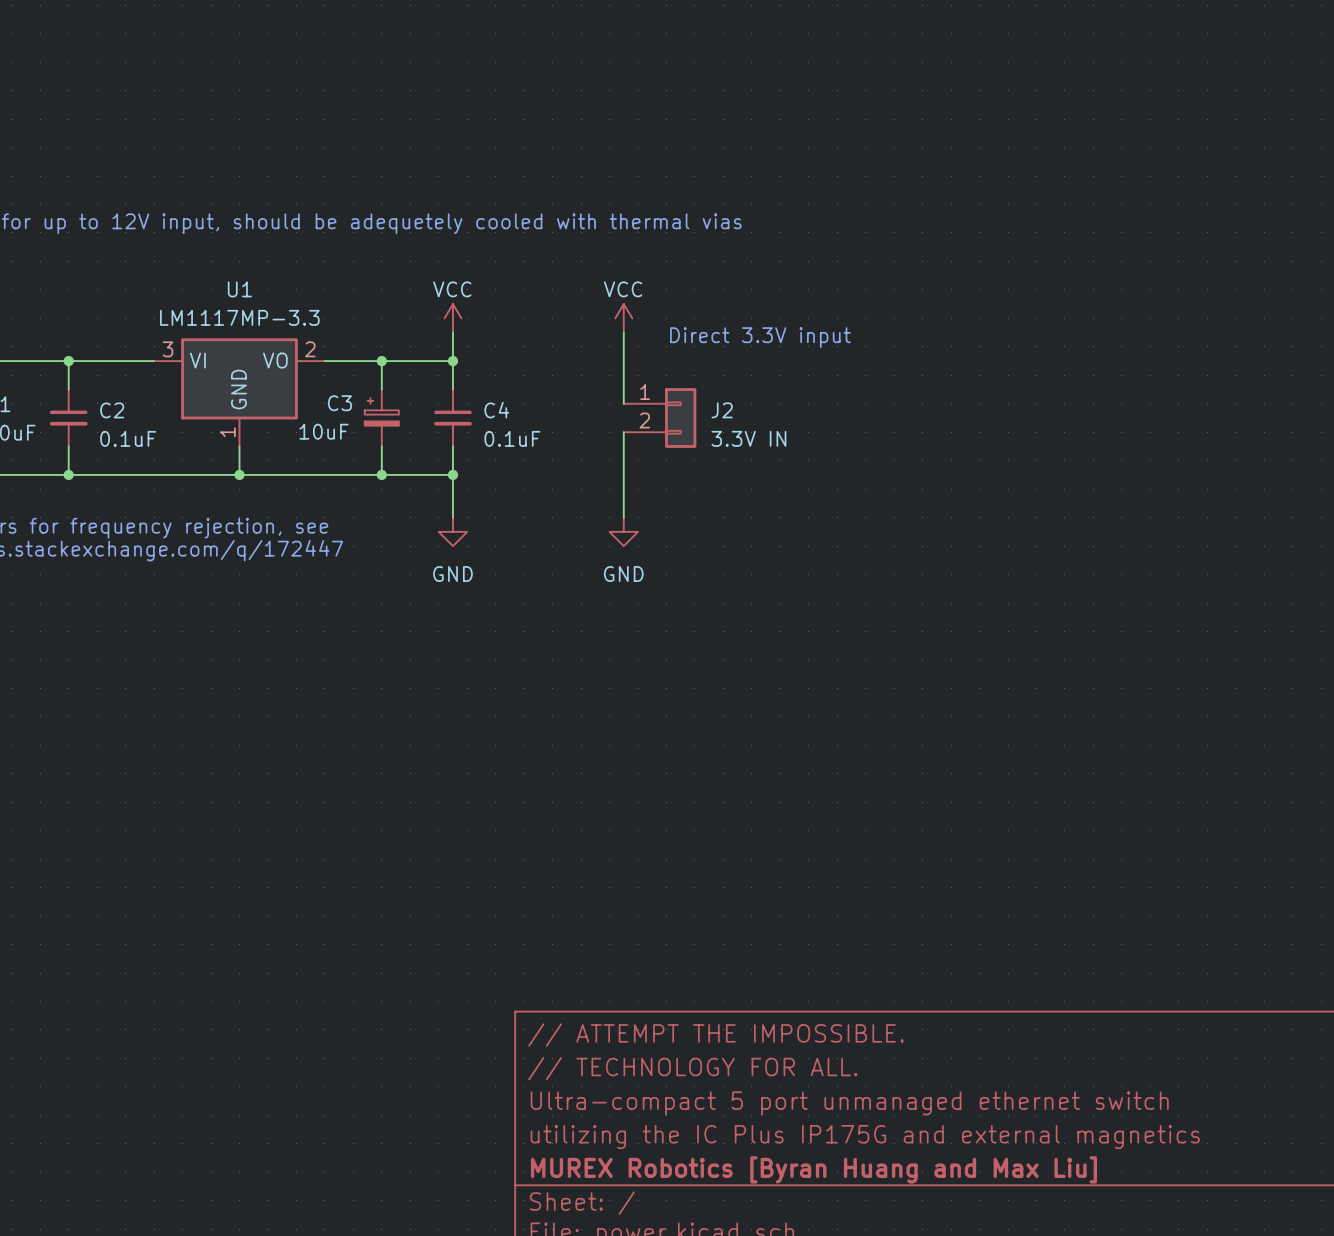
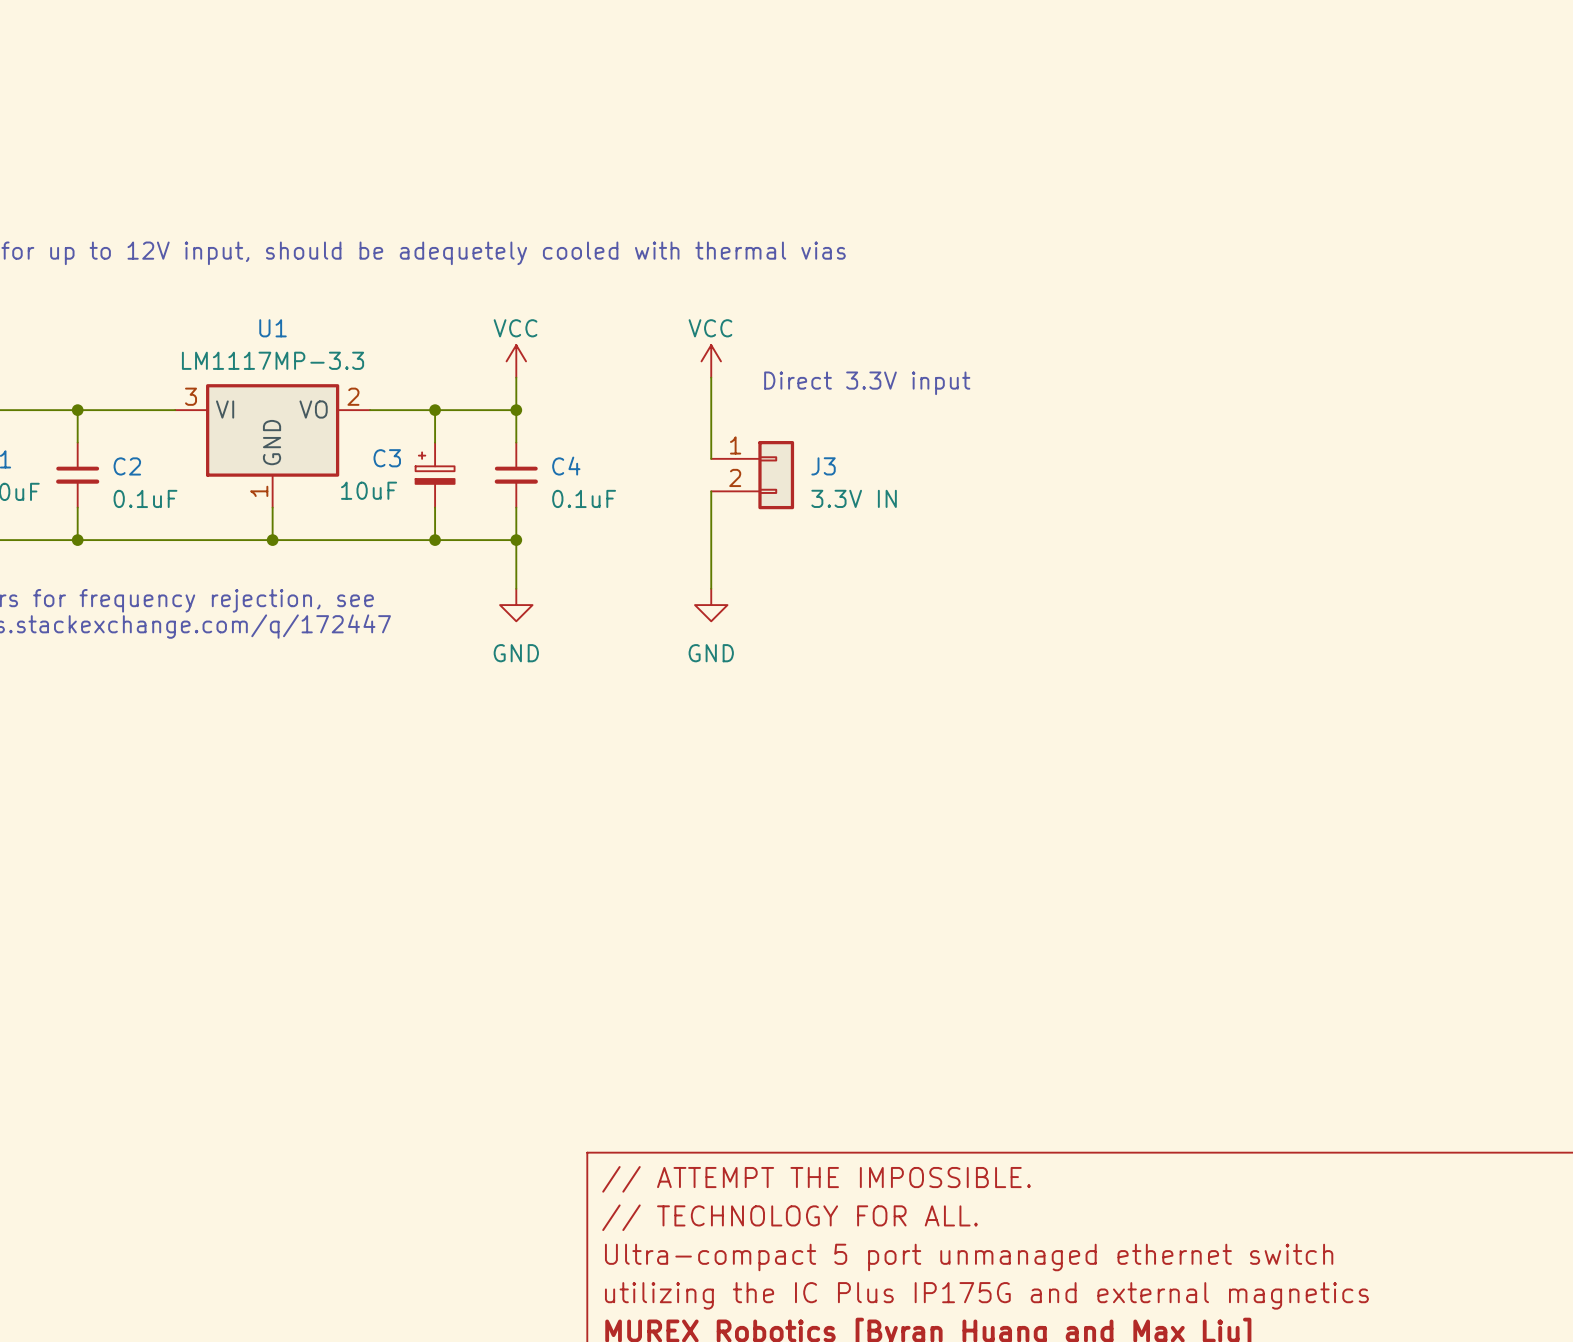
J2 name: J2 (722, 410) -> J3 (823, 466)

